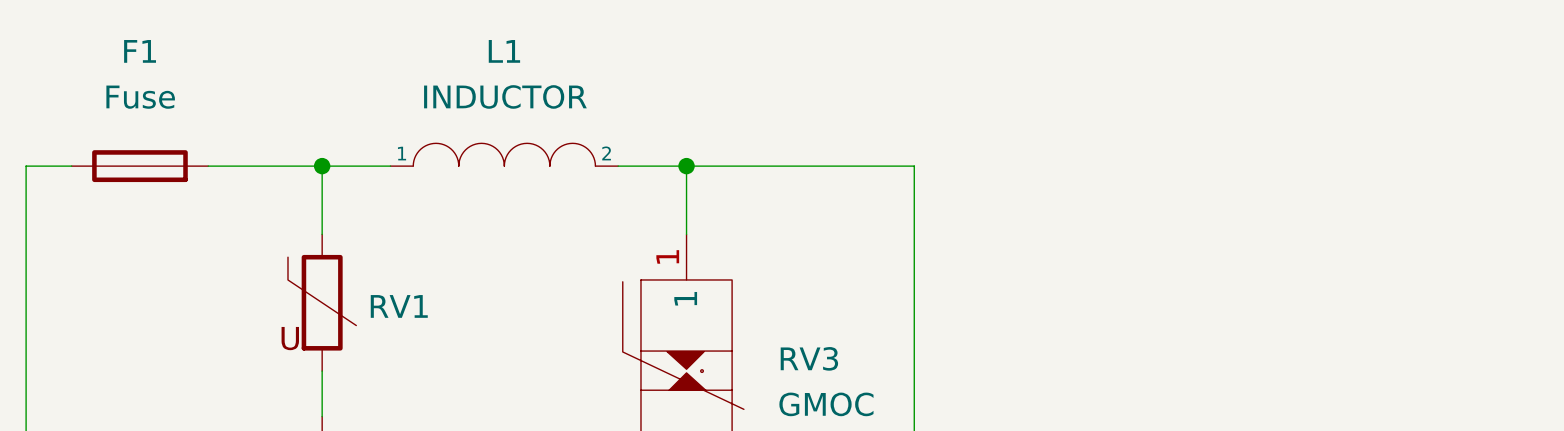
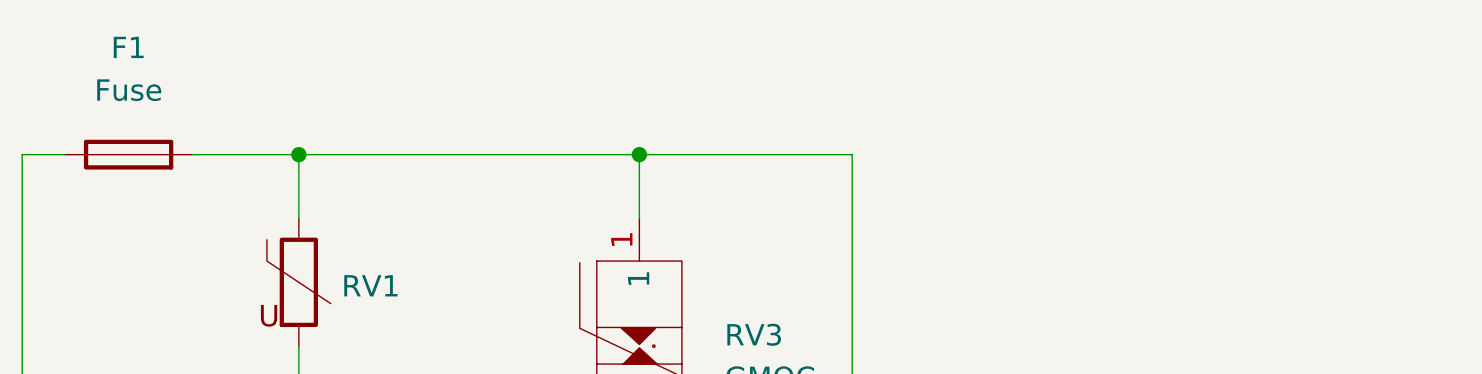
L1: INDUCTOR (504, 154) -> none
wire: none -> (362, 154) (575, 154)

